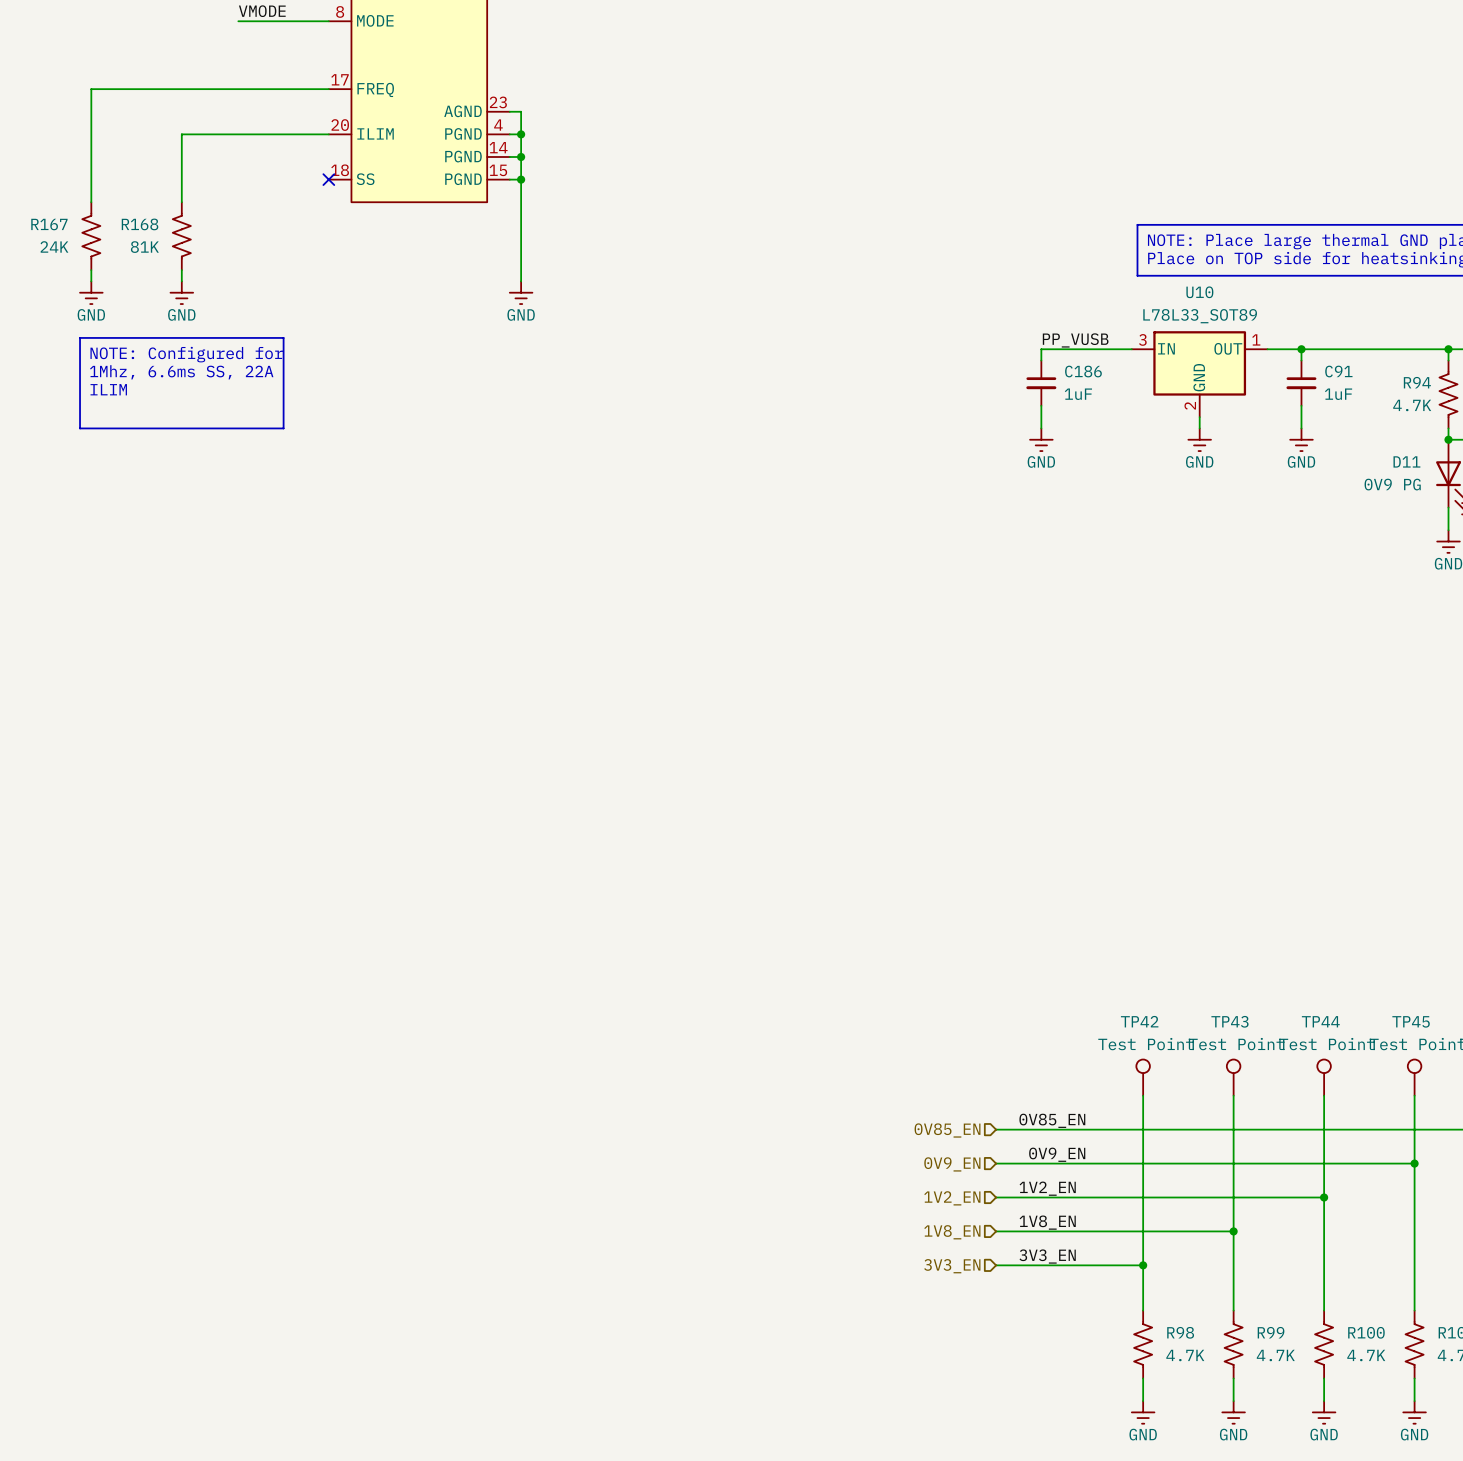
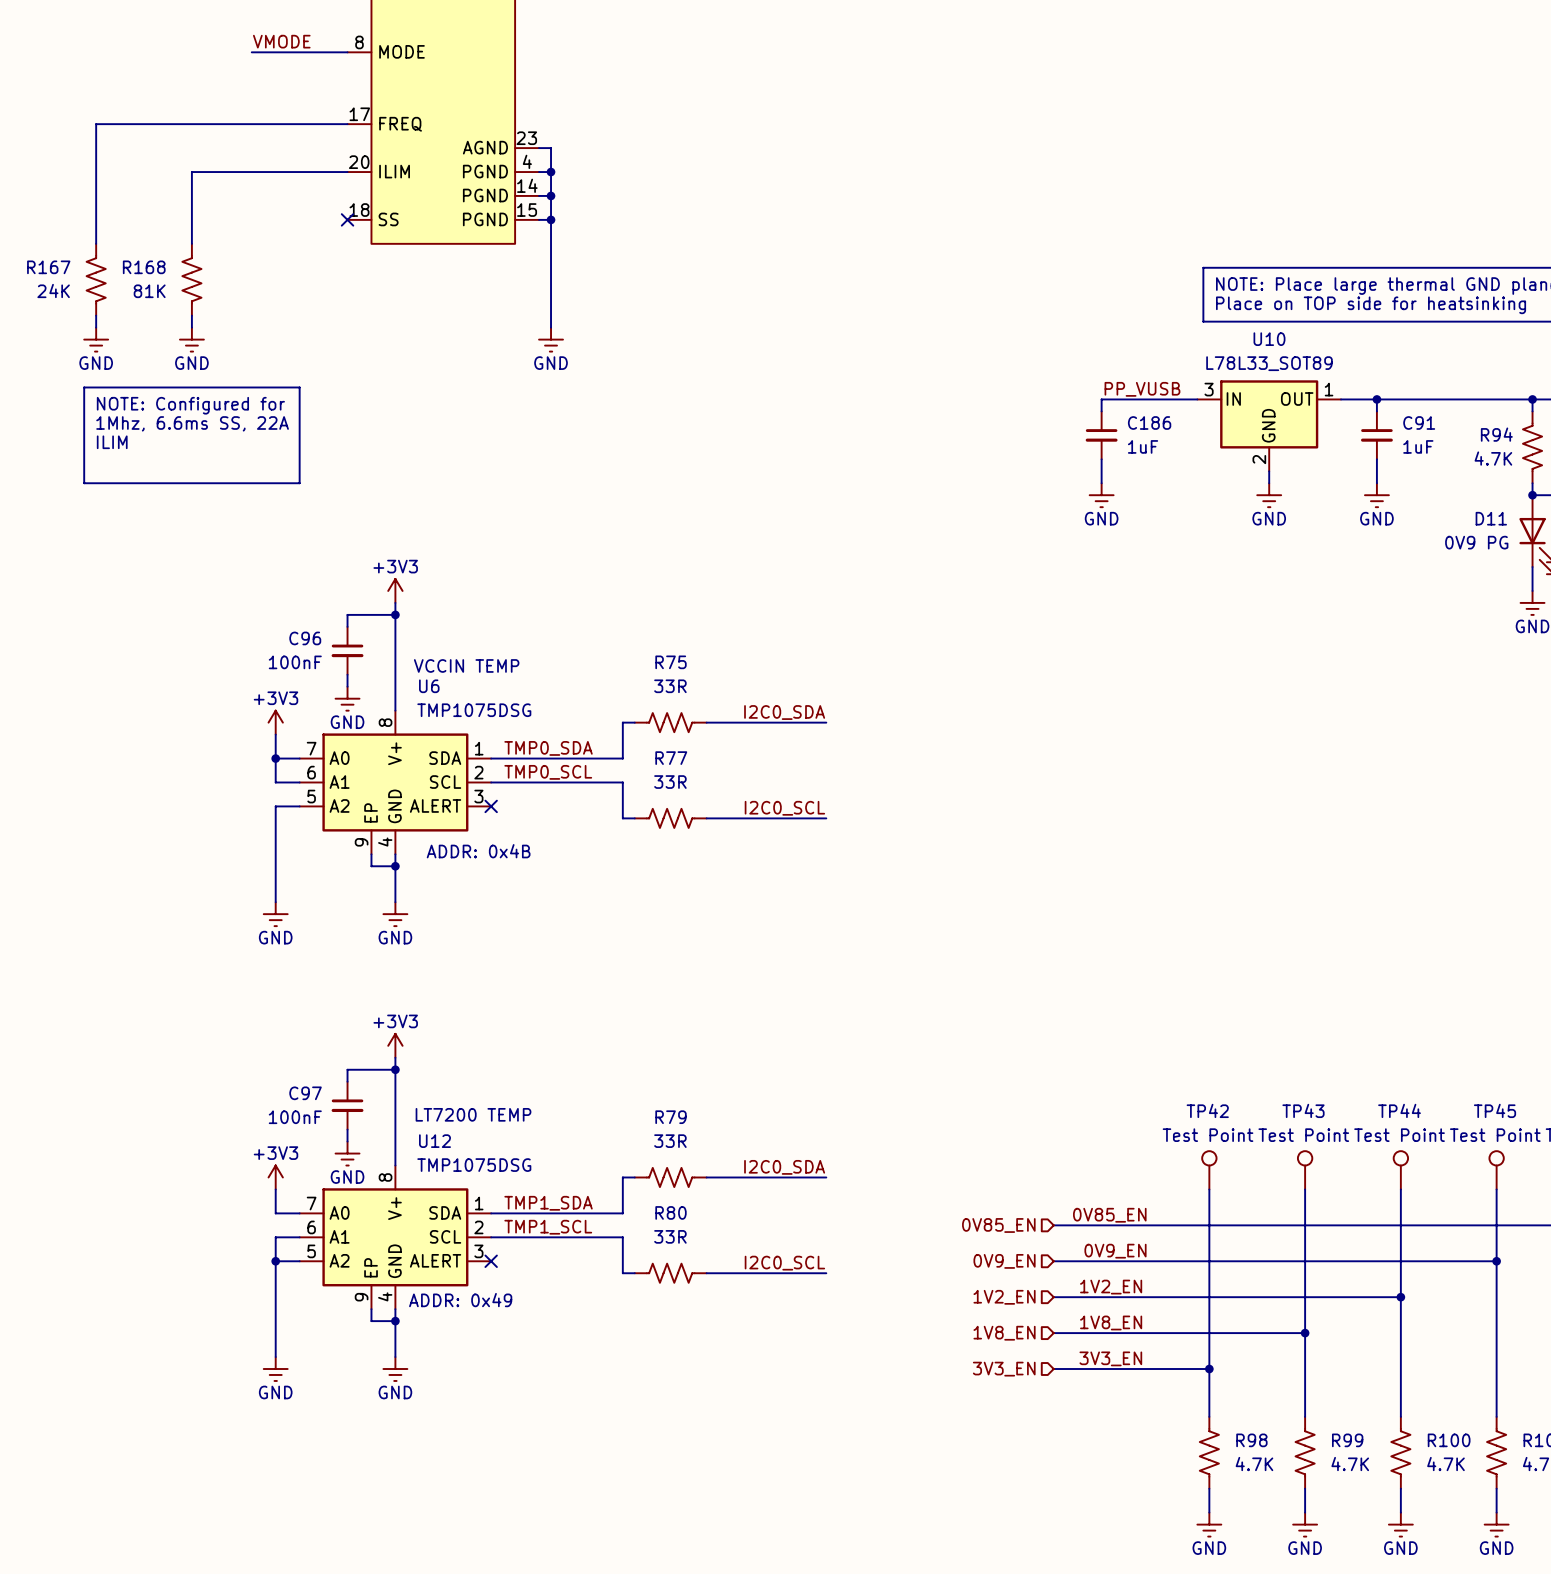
power symbol: none -> +3V3 (395, 590)
wire: none -> (395, 602) (395, 710)
wire: none -> (395, 614) (347, 614) (347, 626)
junction: none -> (395, 614)
C96: none -> 100nF (347, 650)
text: none -> VCCIN TEMP (466, 665)
wire: none -> (347, 674) (347, 686)
power symbol: none -> GND (347, 698)
label: none -> I2C0_SDA (784, 712)
power symbol: none -> +3V3 (275, 722)
wire: none -> (634, 722) (622, 722) (622, 758) (491, 758)
R75: none -> 33R (670, 722)
wire: none -> (706, 722) (826, 722)
wire: none -> (275, 734) (275, 782) (299, 782)
label: none -> TMP0_SDA (548, 748)
wire: none -> (275, 758) (299, 758)
junction: none -> (275, 758)
label: none -> TMP0_SCL (548, 772)
U6: none -> TMP1075DSG (395, 782)
wire: none -> (491, 782) (622, 782) (622, 818) (634, 818)
wire: none -> (299, 806) (275, 806) (275, 902)
no-connect mark: none -> (491, 806)
label: none -> I2C0_SCL (784, 808)
R77: none -> 33R (670, 818)
wire: none -> (706, 818) (826, 818)
text: none -> ADDR: 0x4B (478, 851)
wire: none -> (371, 854) (371, 866) (395, 866)
wire: none -> (395, 854) (395, 902)
junction: none -> (395, 866)
power symbol: none -> GND (275, 914)
power symbol: none -> GND (395, 914)
power symbol: none -> +3V3 (395, 1045)
wire: none -> (395, 1057) (395, 1165)
wire: none -> (395, 1069) (347, 1069) (347, 1081)
junction: none -> (395, 1069)
C97: none -> 100nF (347, 1105)
text: none -> LT7200 TEMP (473, 1114)
wire: none -> (347, 1129) (347, 1141)
power symbol: none -> GND (347, 1153)
label: none -> I2C0_SDA (784, 1167)
power symbol: none -> +3V3 (275, 1177)
wire: none -> (634, 1177) (622, 1177) (622, 1213) (491, 1213)
R79: none -> 33R (670, 1177)
wire: none -> (706, 1177) (826, 1177)
wire: none -> (275, 1189) (275, 1213) (299, 1213)
label: none -> TMP1_SDA (548, 1203)
label: none -> TMP1_SCL (548, 1227)
wire: none -> (299, 1237) (275, 1237) (275, 1357)
U12: none -> TMP1075DSG (395, 1237)
wire: none -> (491, 1237) (622, 1237) (622, 1273) (634, 1273)
wire: none -> (275, 1261) (299, 1261)
junction: none -> (275, 1261)
no-connect mark: none -> (491, 1261)
label: none -> I2C0_SCL (784, 1263)
R80: none -> 33R (670, 1273)
wire: none -> (706, 1273) (826, 1273)
text: none -> ADDR: 0x49 (460, 1300)
wire: none -> (371, 1309) (371, 1321) (395, 1321)
wire: none -> (395, 1309) (395, 1357)
junction: none -> (395, 1321)
power symbol: none -> GND (275, 1369)
power symbol: none -> GND (395, 1369)

